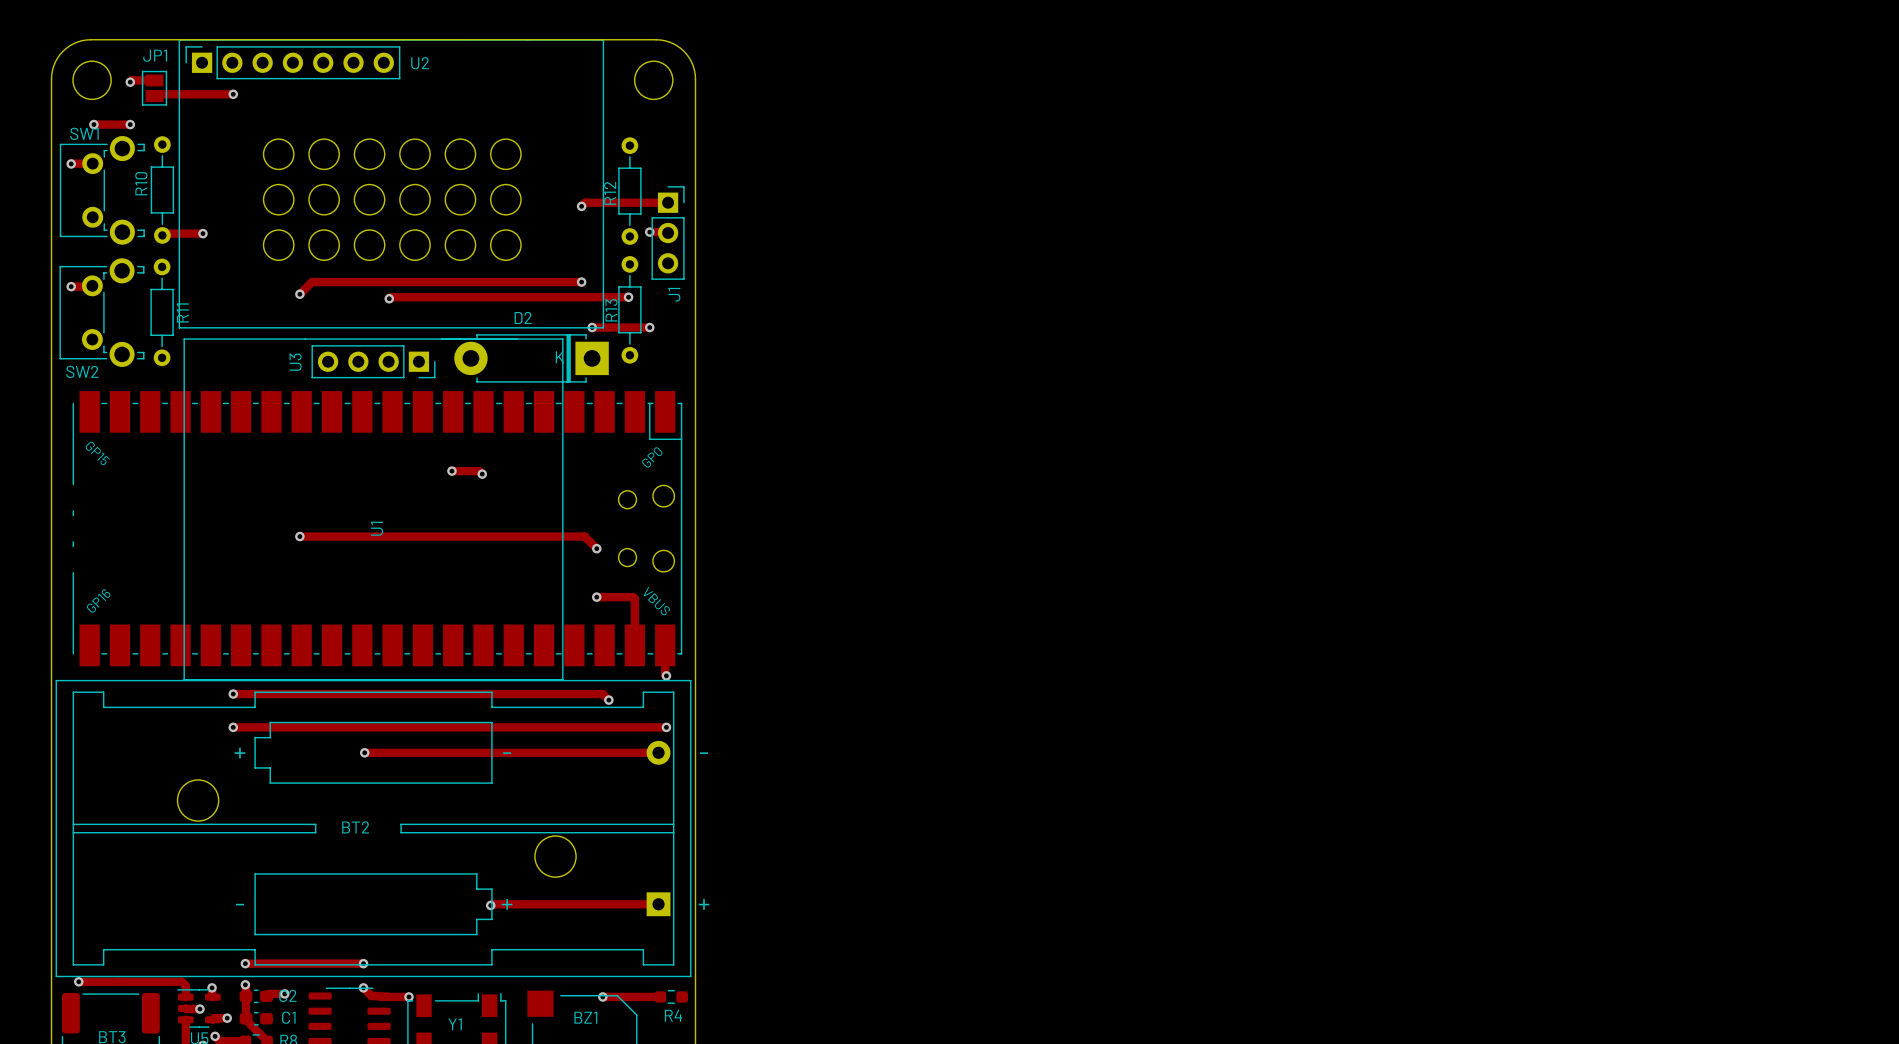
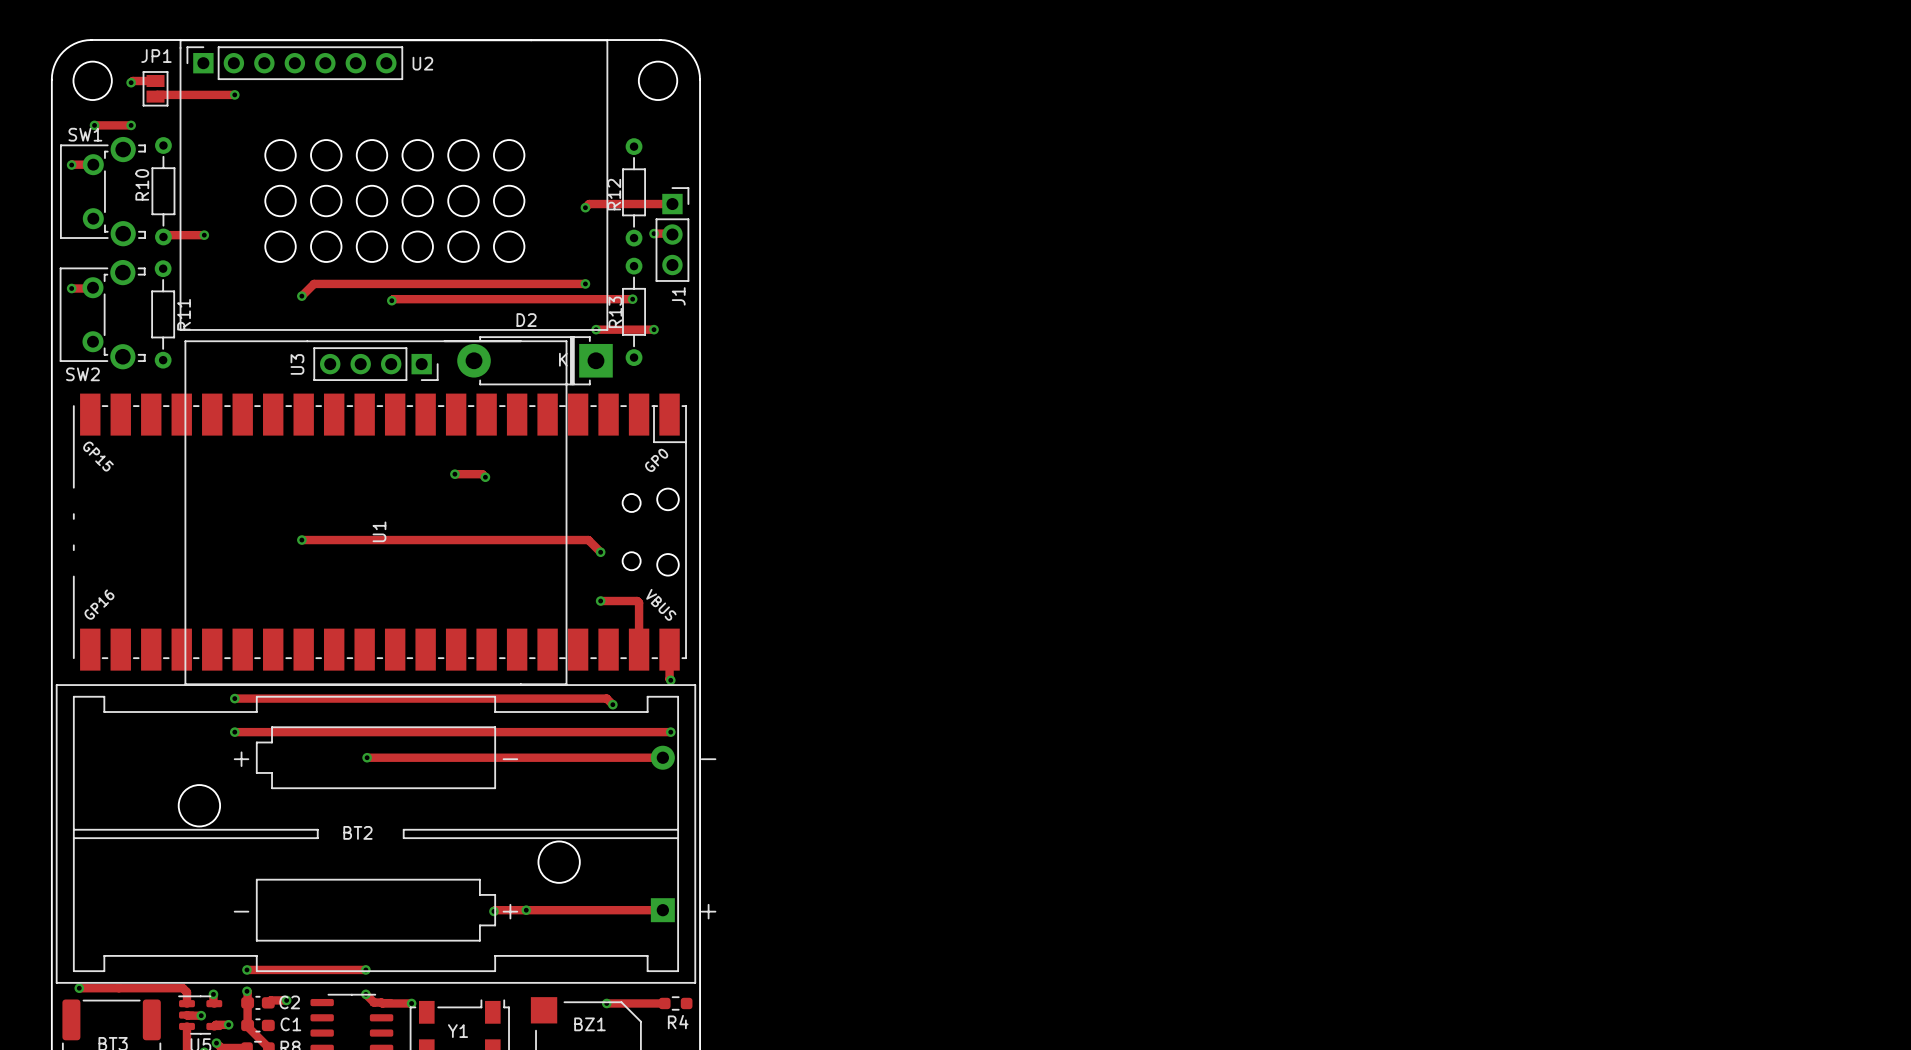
via: none -> (526, 910)

